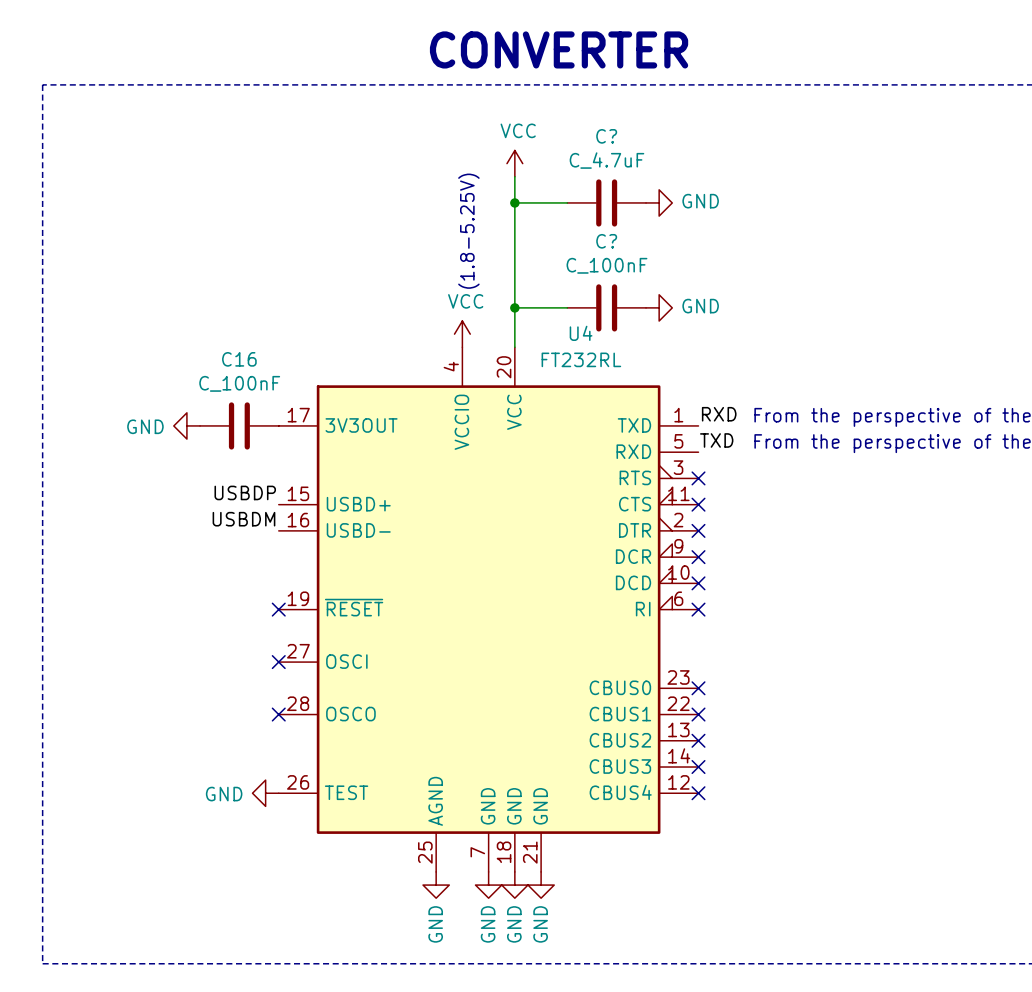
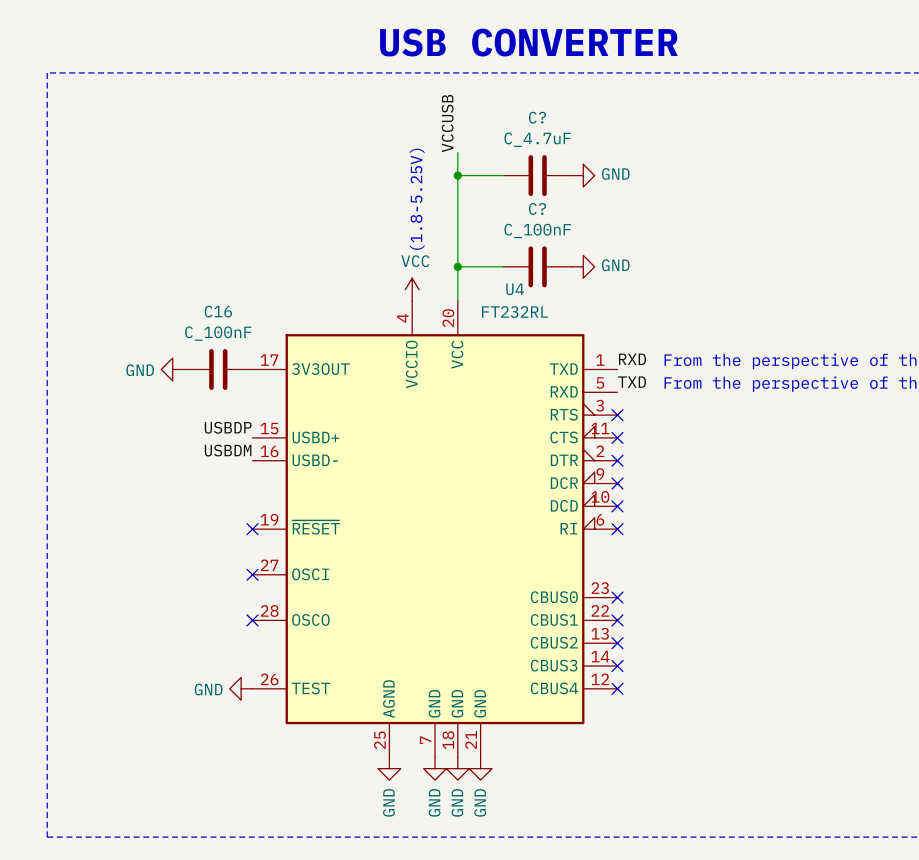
text: CONVERTER (559, 49) -> USB CONVERTER (528, 42)
label: none -> VCCUSB (447, 123)
power symbol: VCC (514, 163) -> none

